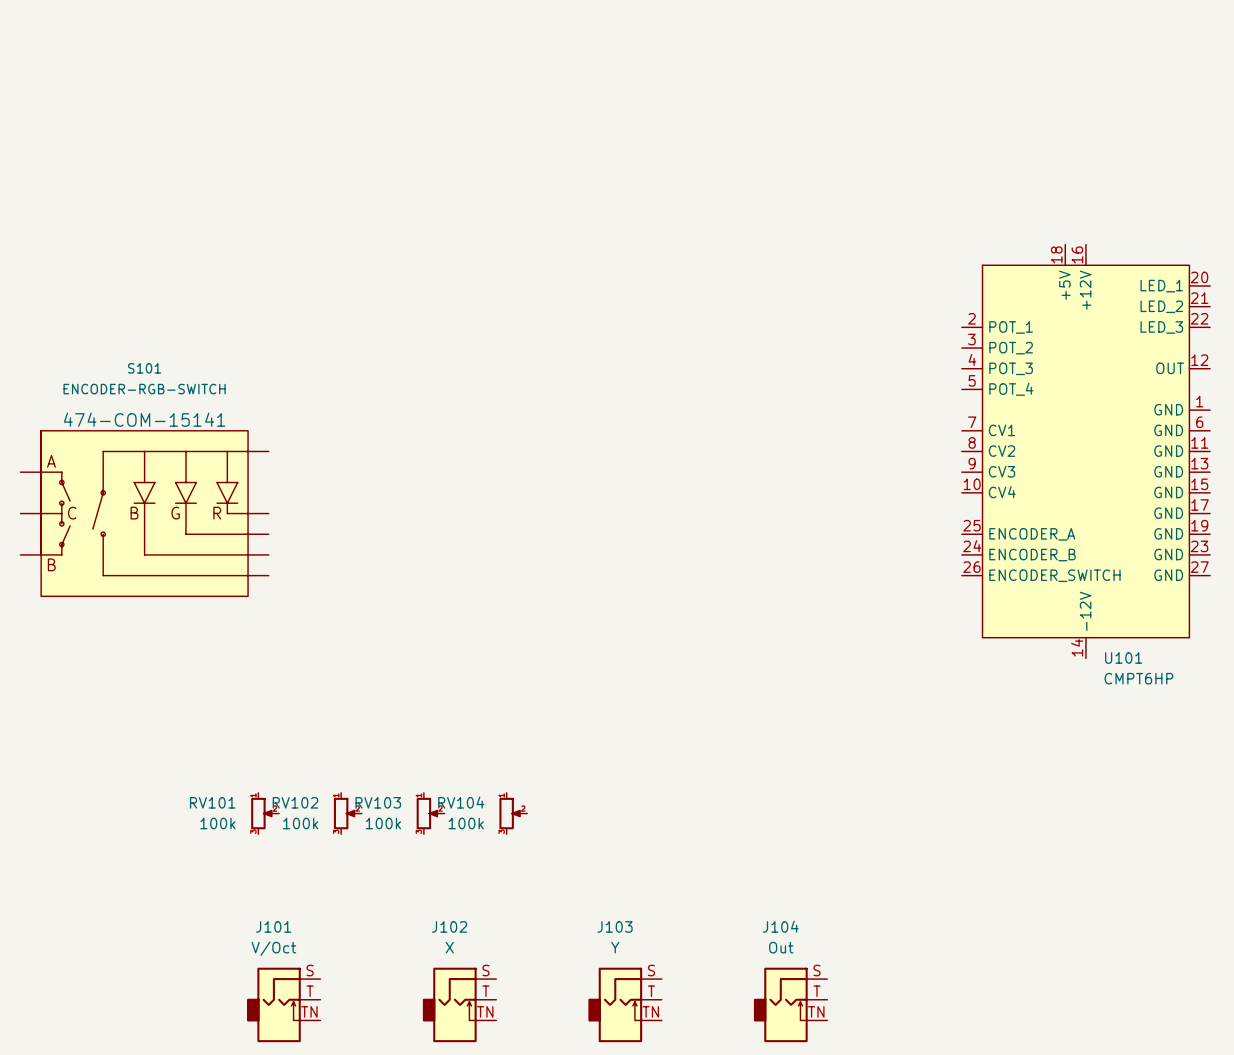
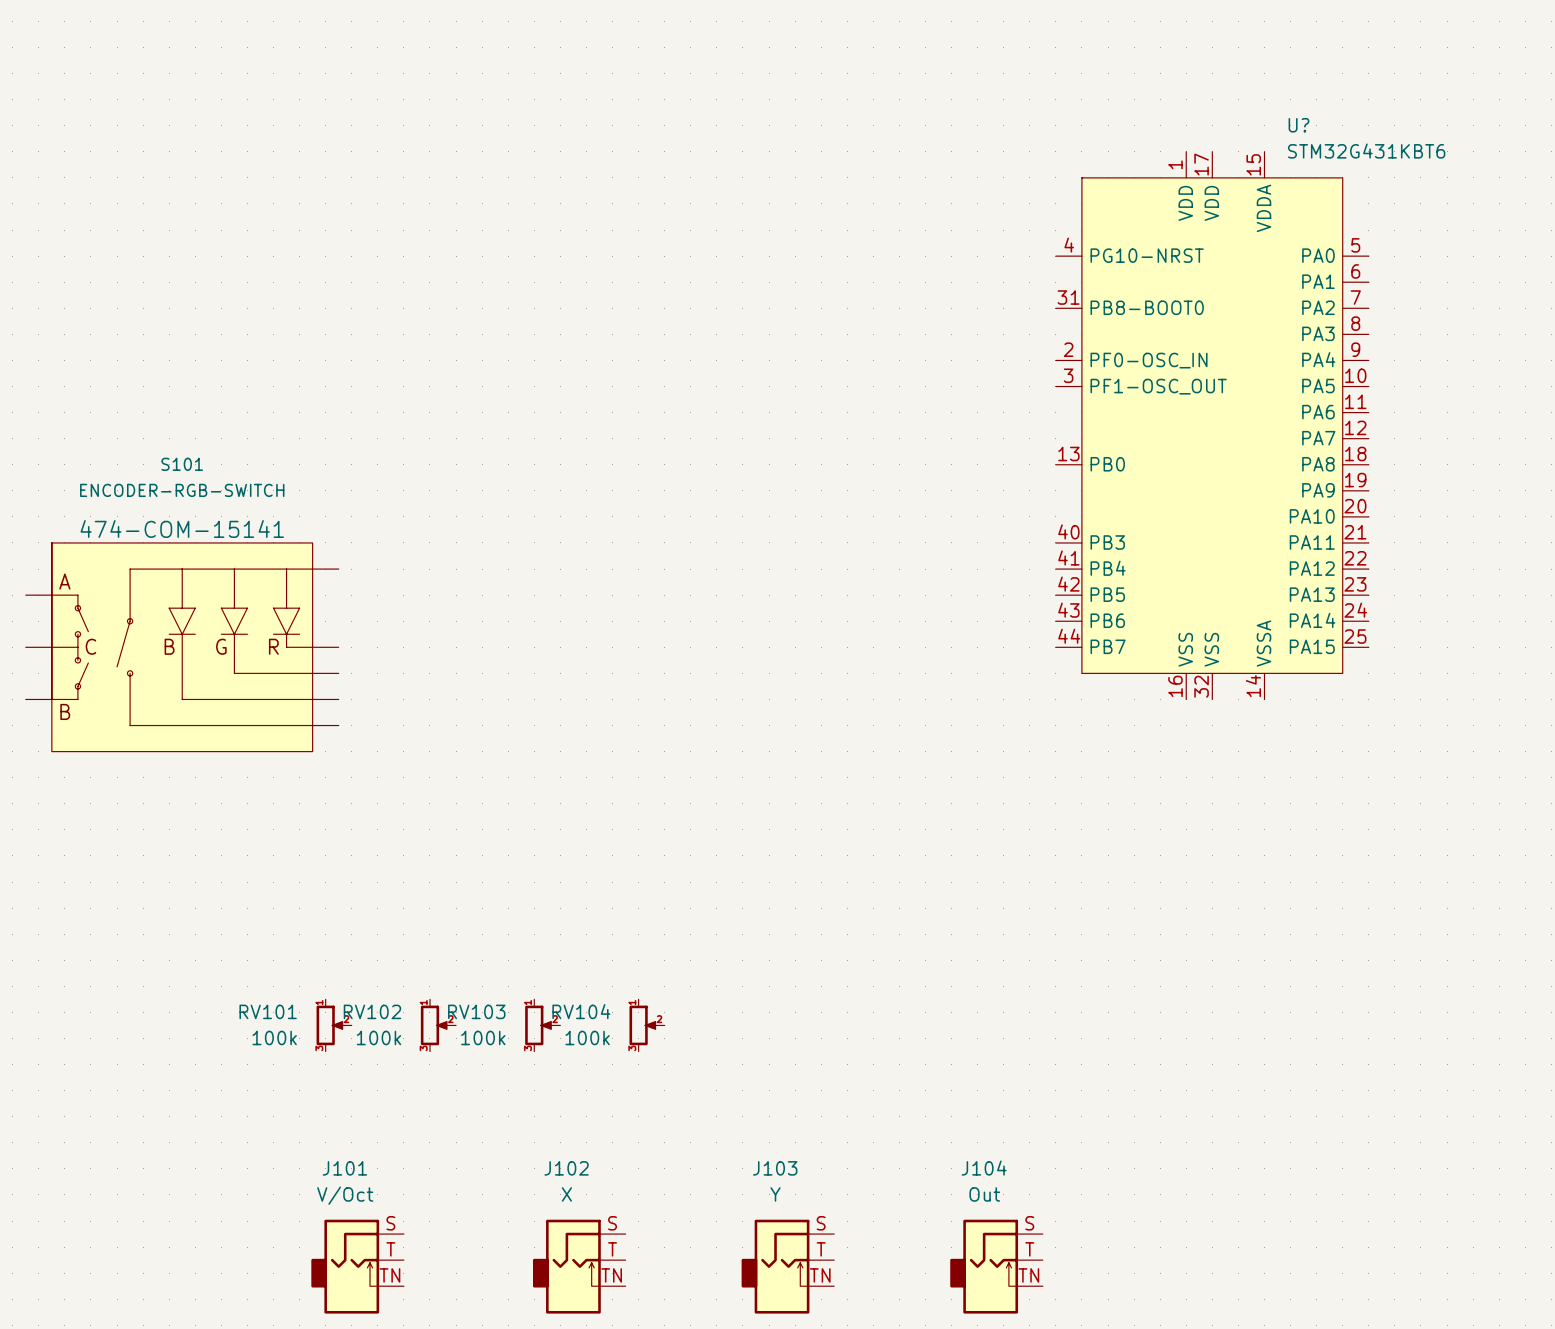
U?: none -> STM32G431KBT6 (1212, 425)
U101: CMPT6HP (1085, 451) -> none

